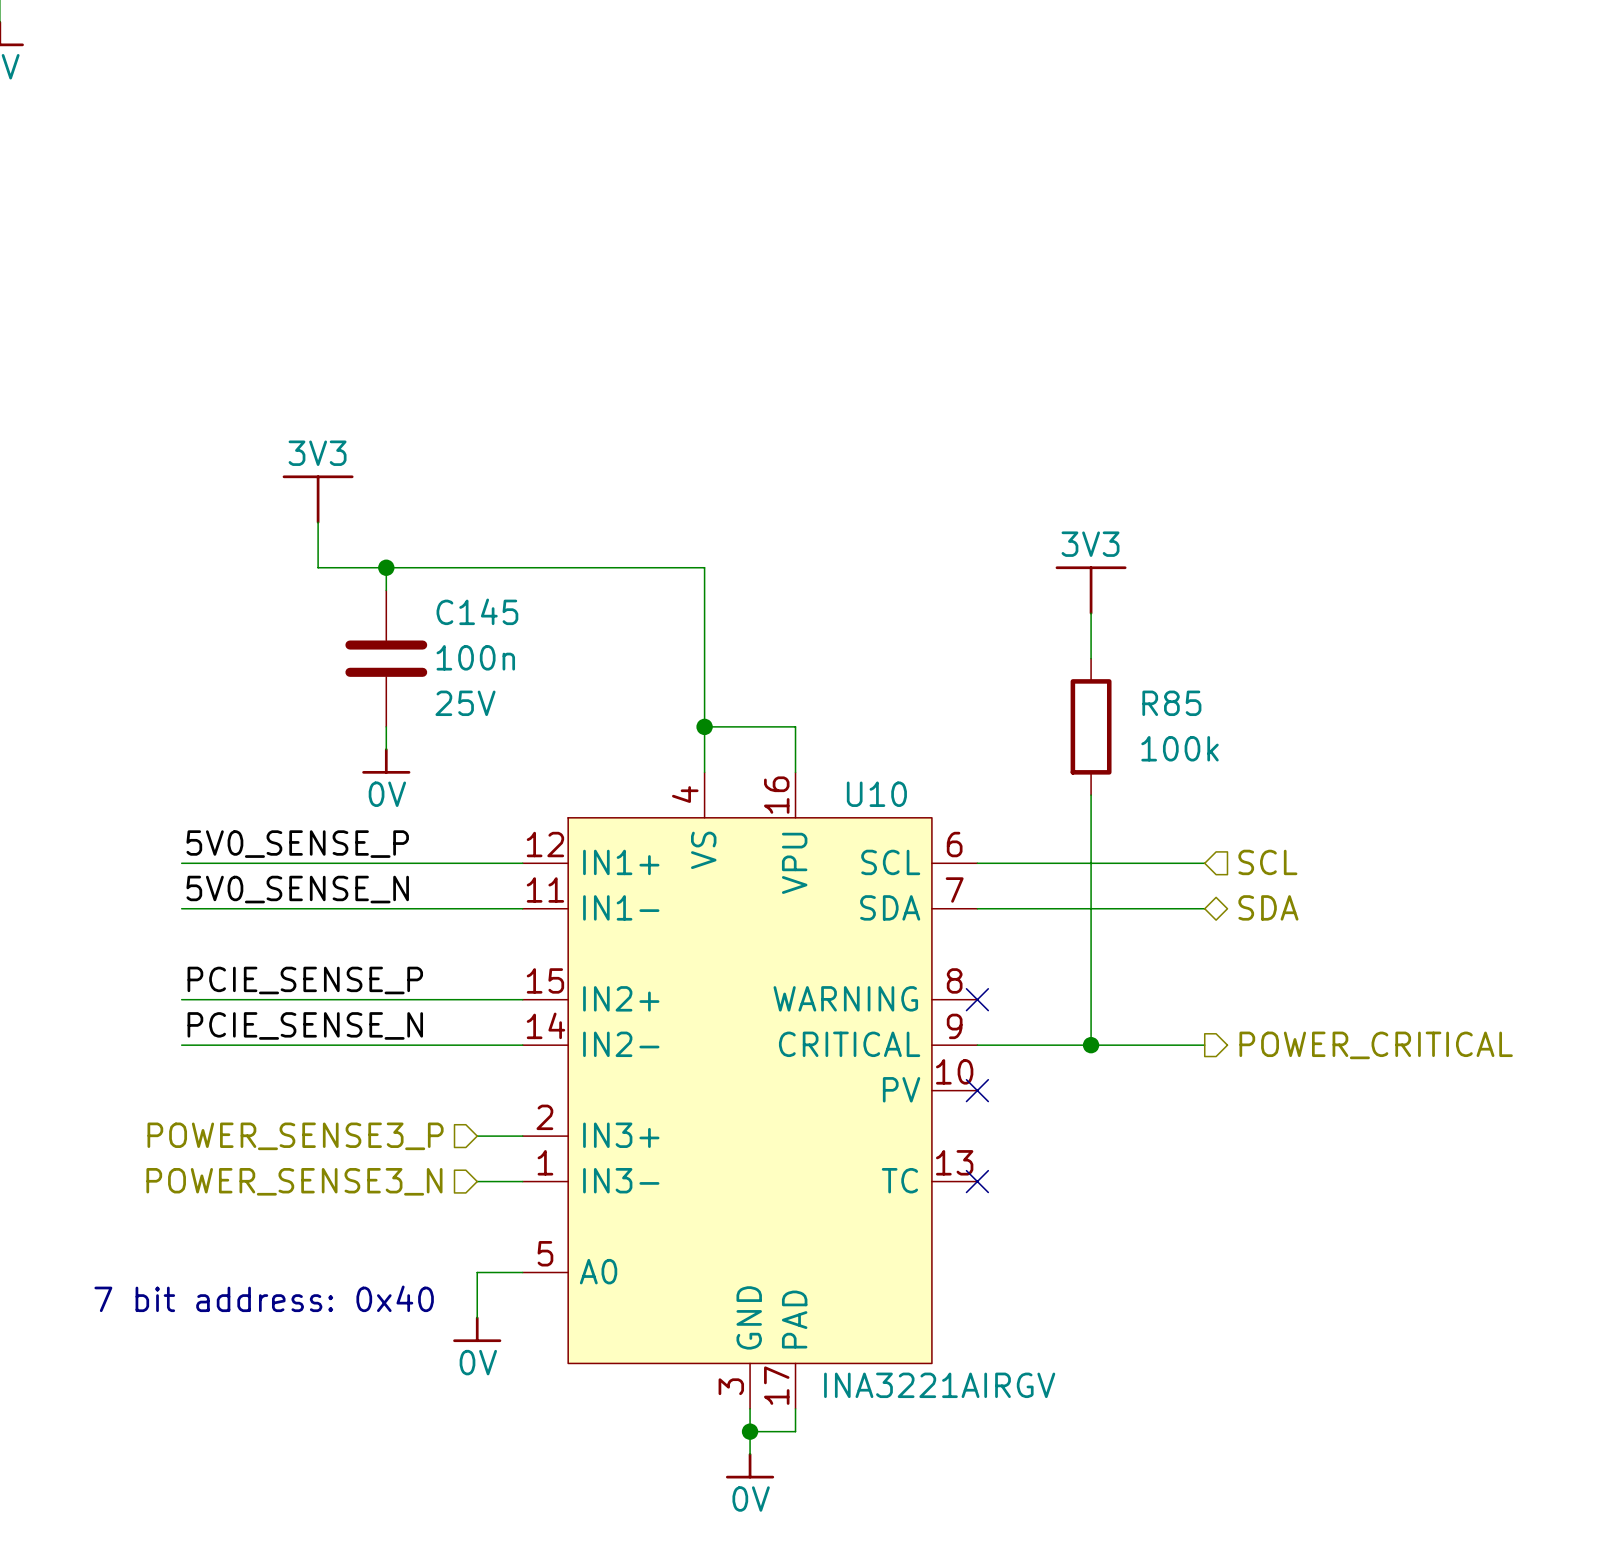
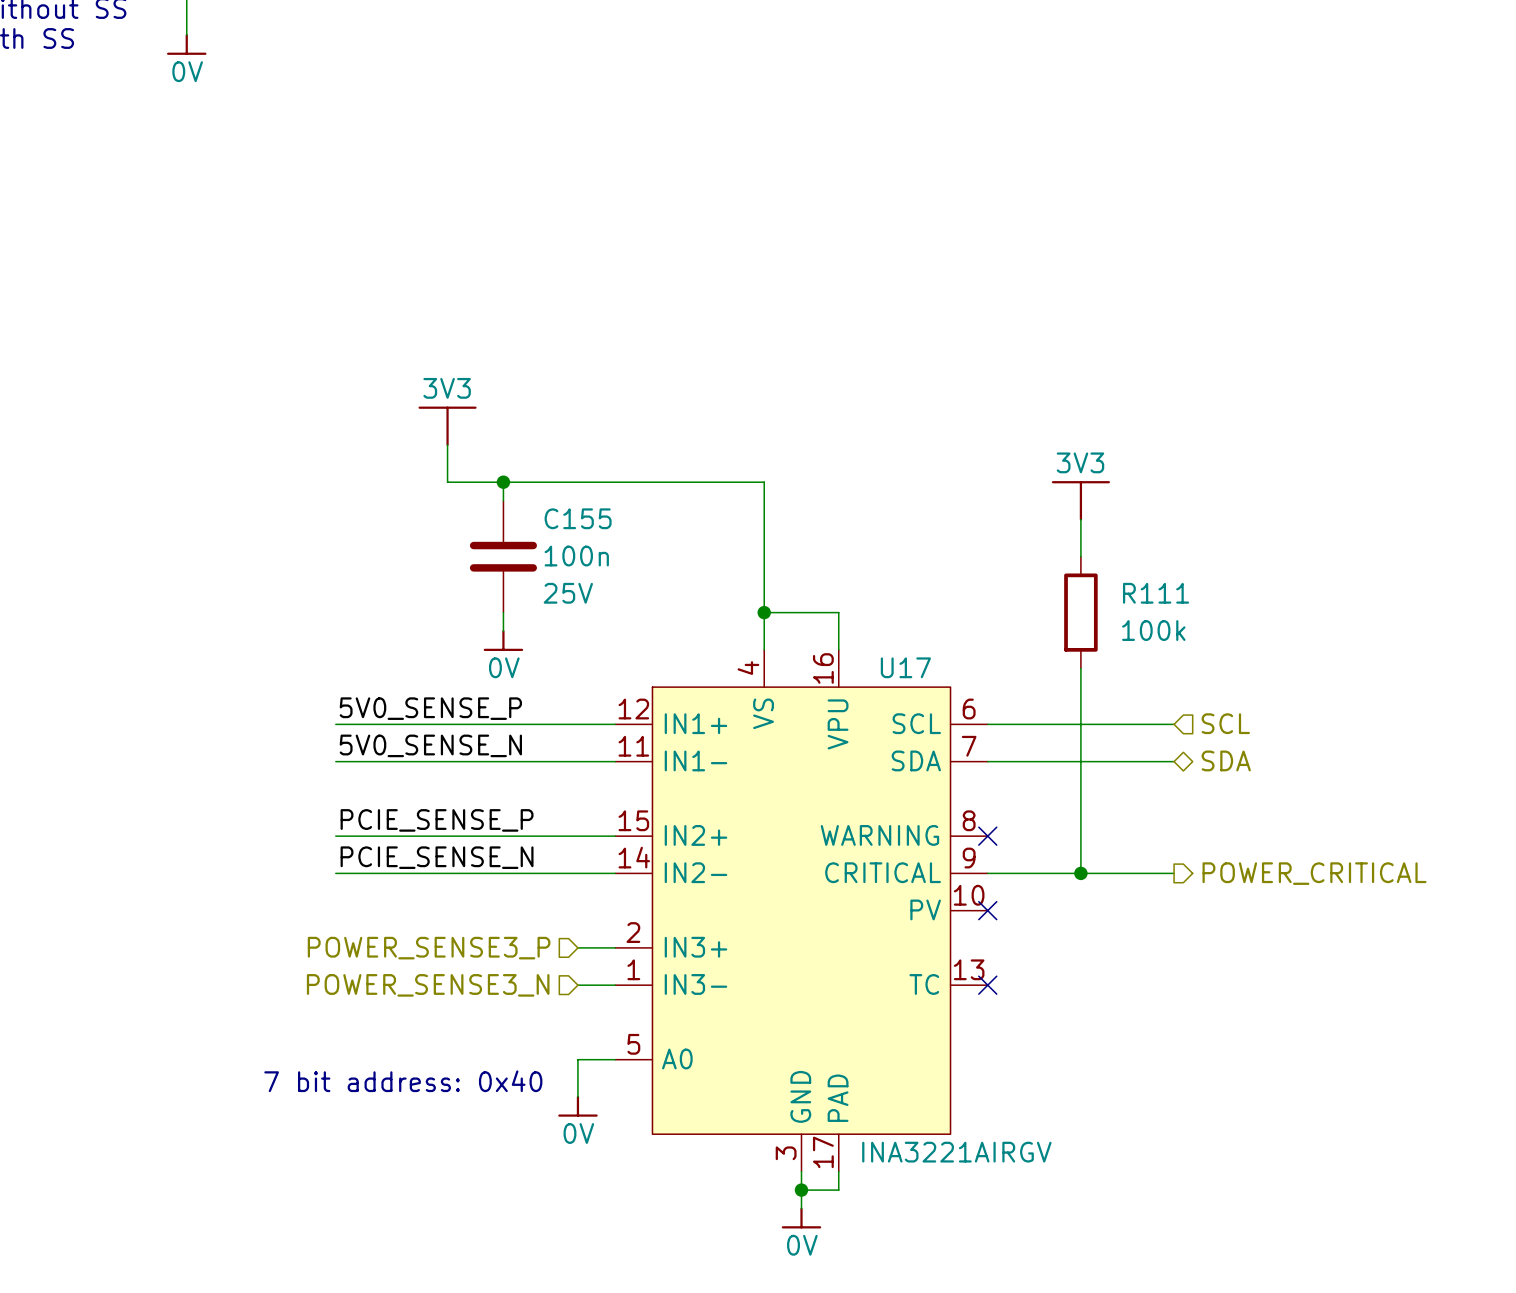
C145 name: C145 (477, 611) -> C155 (578, 518)
R85 name: R85 (1171, 703) -> R111 (1156, 593)
U10 name: U10 (876, 794) -> U17 (905, 667)

